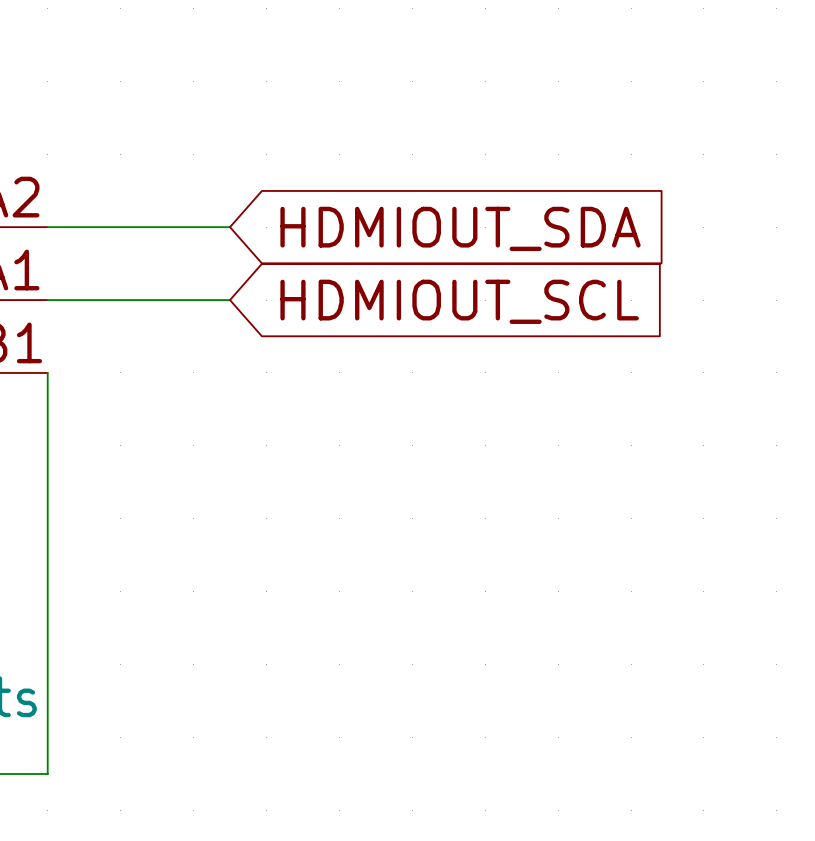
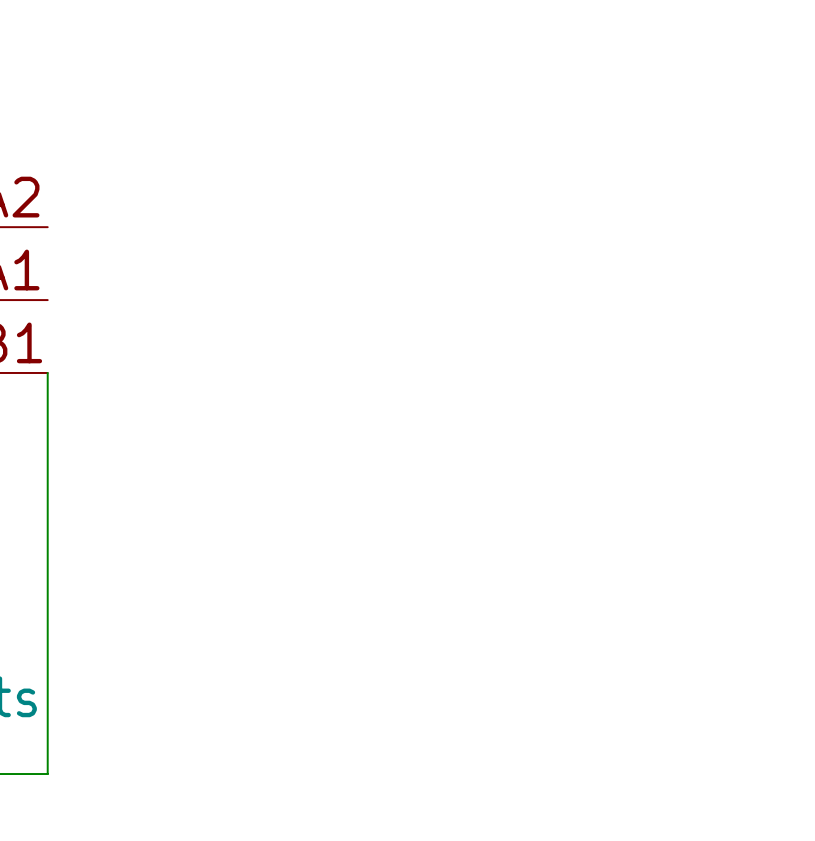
wire: (47, 227) (230, 227) -> none
global label: HDMIOUT_SDA (460, 228) -> none
wire: (47, 300) (230, 300) -> none
global label: HDMIOUT_SCL (459, 301) -> none

